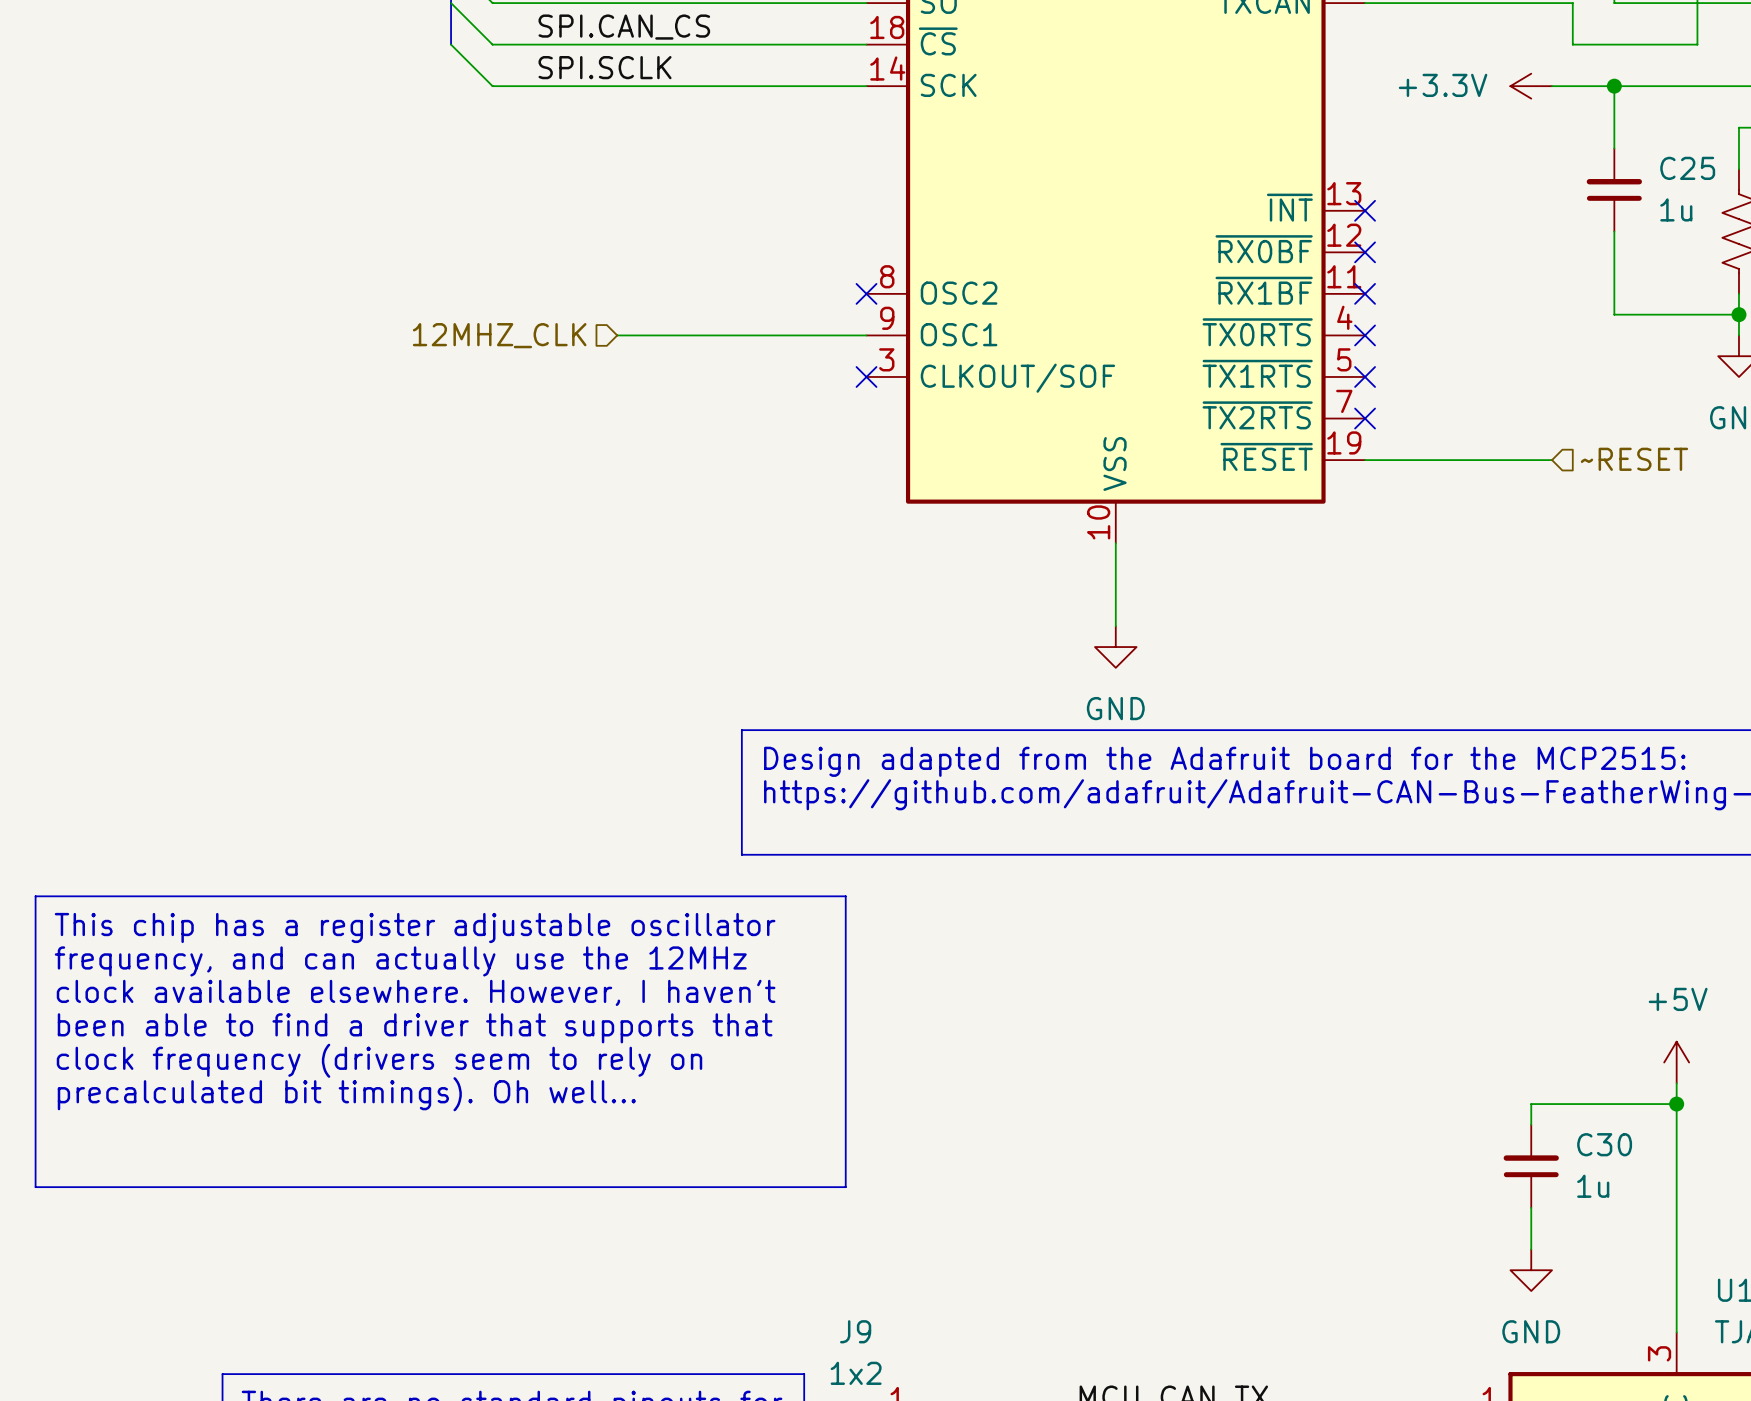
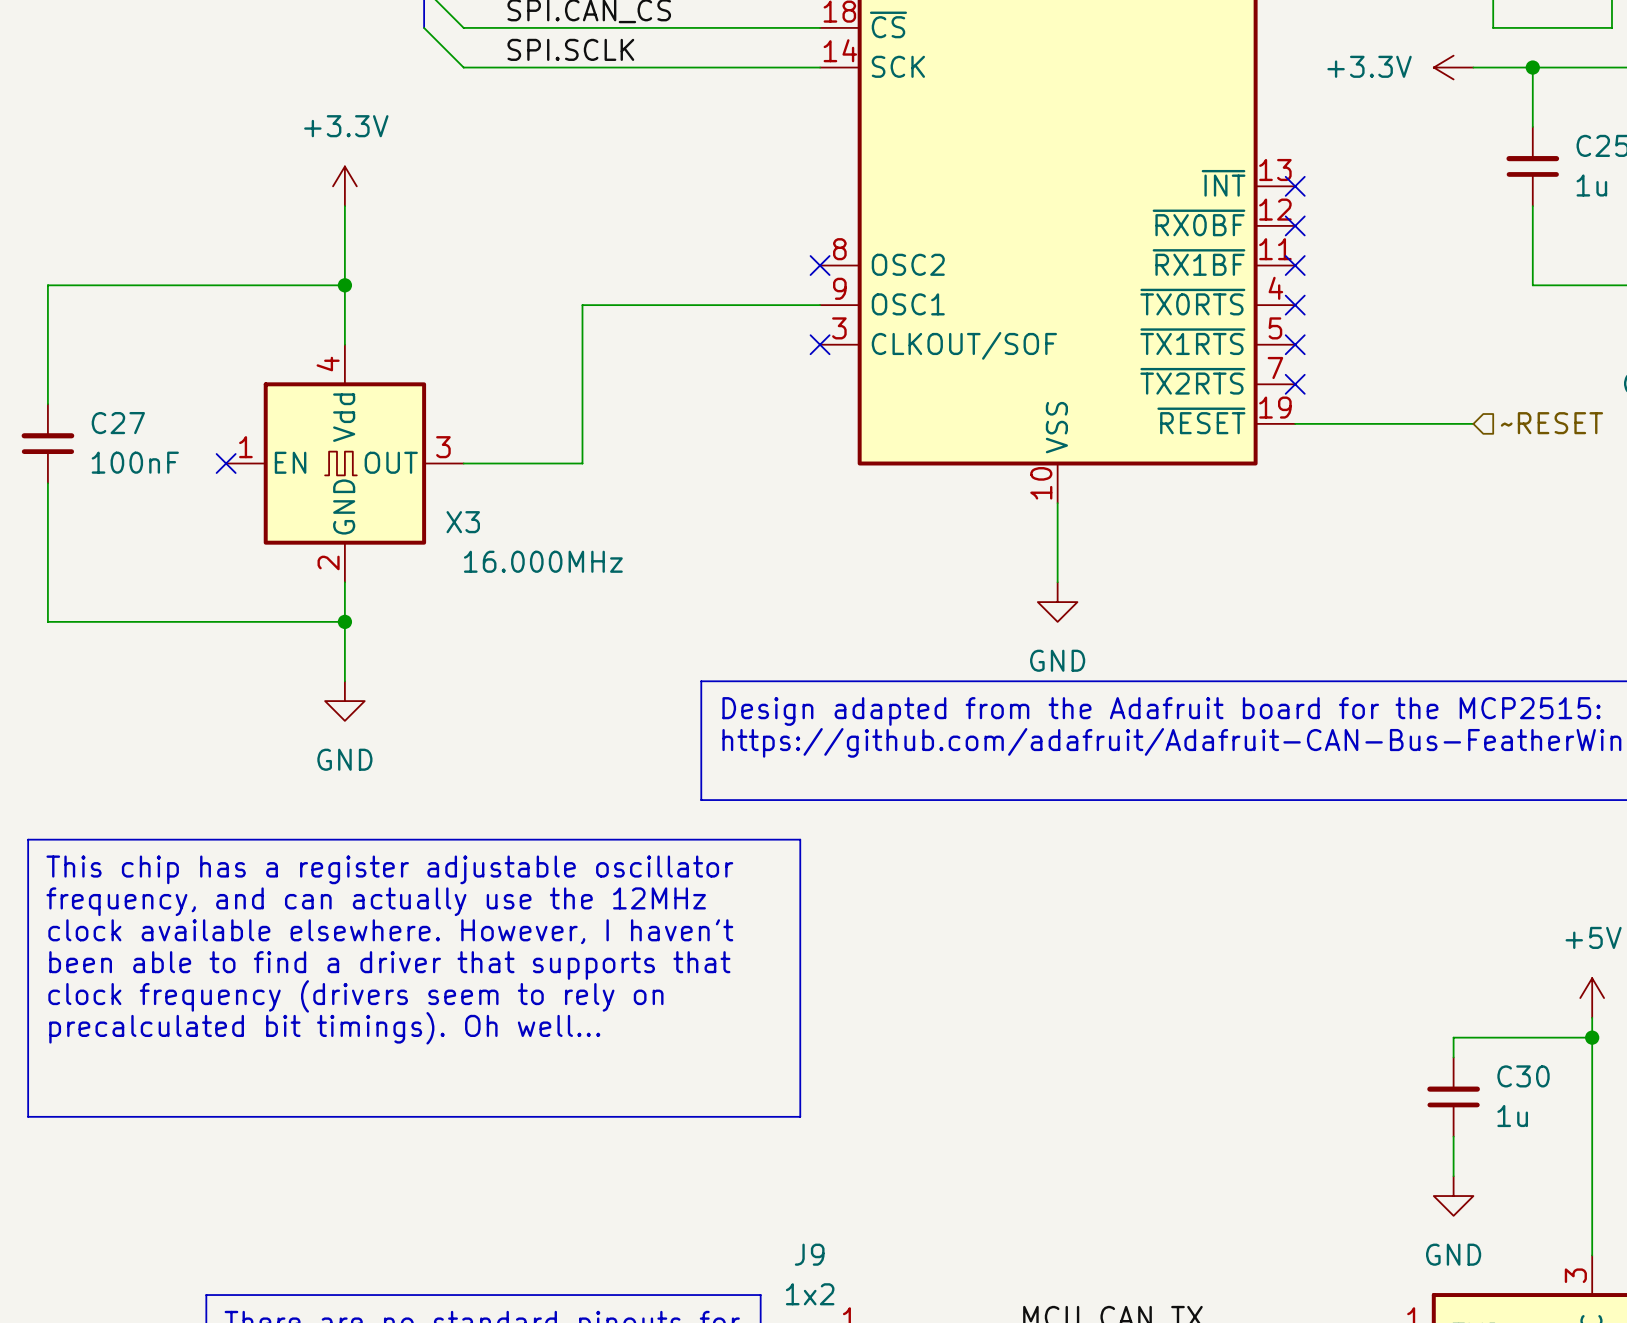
power symbol: none -> +3.3V (344, 186)
wire: none -> (344, 206) (344, 344)
wire: none -> (344, 285) (47, 285) (47, 404)
junction: none -> (344, 285)
hierarchical label: 12MHZ_CLK (499, 335) -> none
wire: none -> (582, 305) (582, 463) (463, 463)
C27: none -> 100nF (47, 443)
no-connect mark: none -> (226, 463)
X3: none -> 16.000MHz (344, 463)
wire: none -> (47, 483) (47, 621) (344, 621)
wire: none -> (344, 582) (344, 681)
junction: none -> (344, 621)
power symbol: none -> GND (344, 701)

